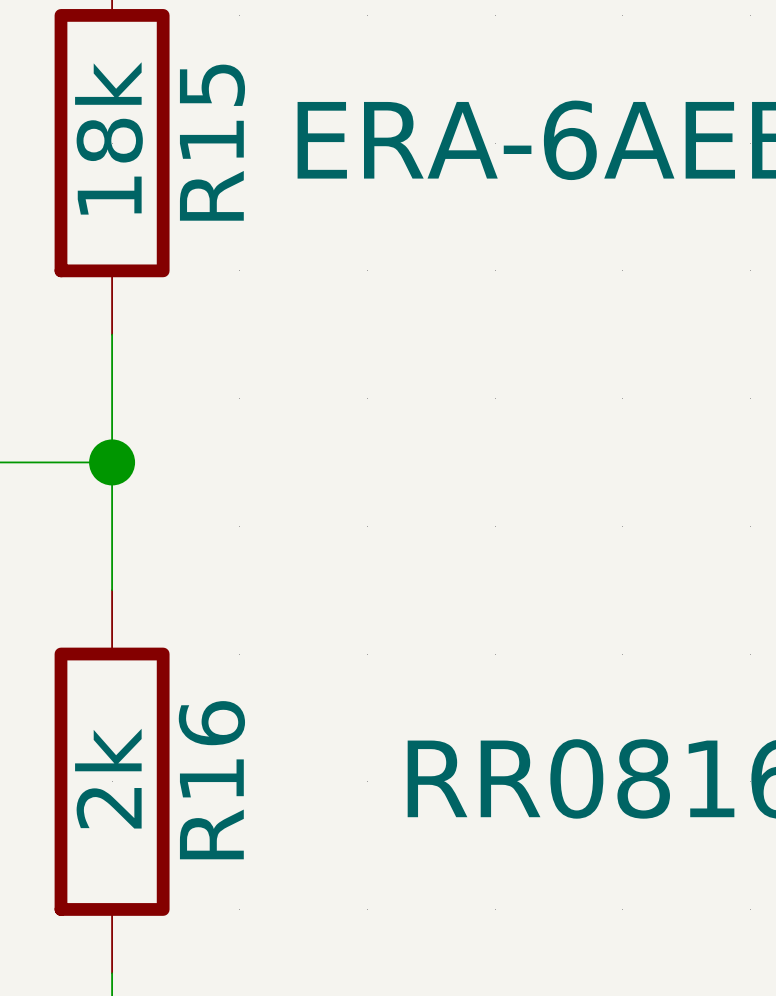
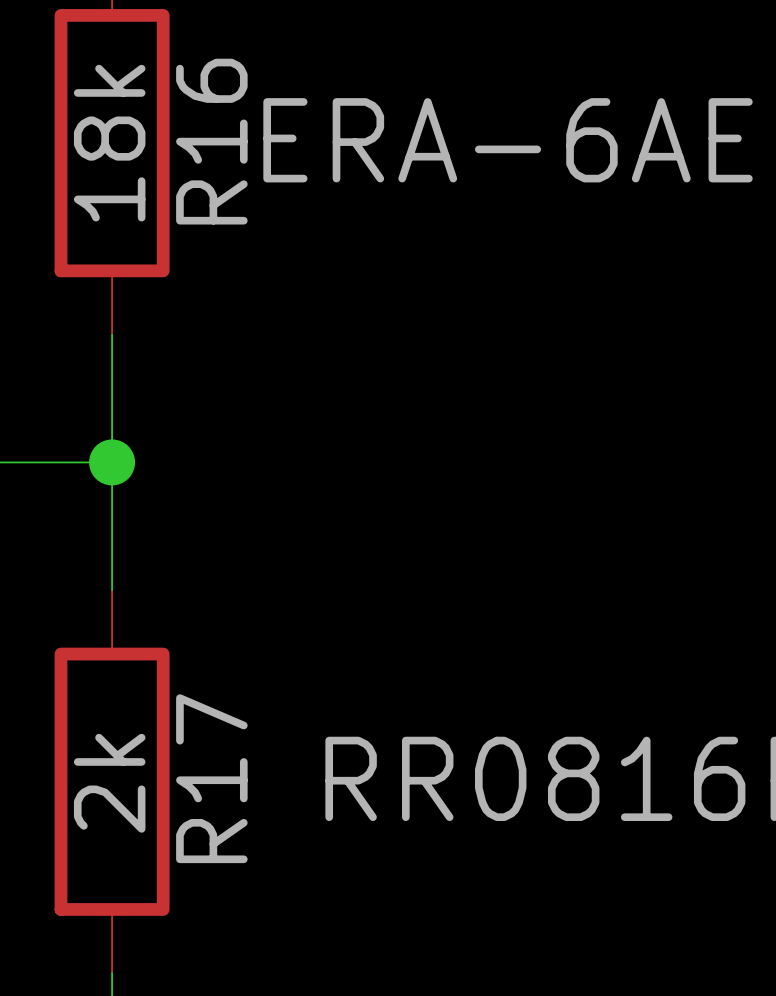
R15 name: R15 (212, 142) -> R16 (211, 141)
R16 name: R16 (211, 780) -> R17 (211, 778)

